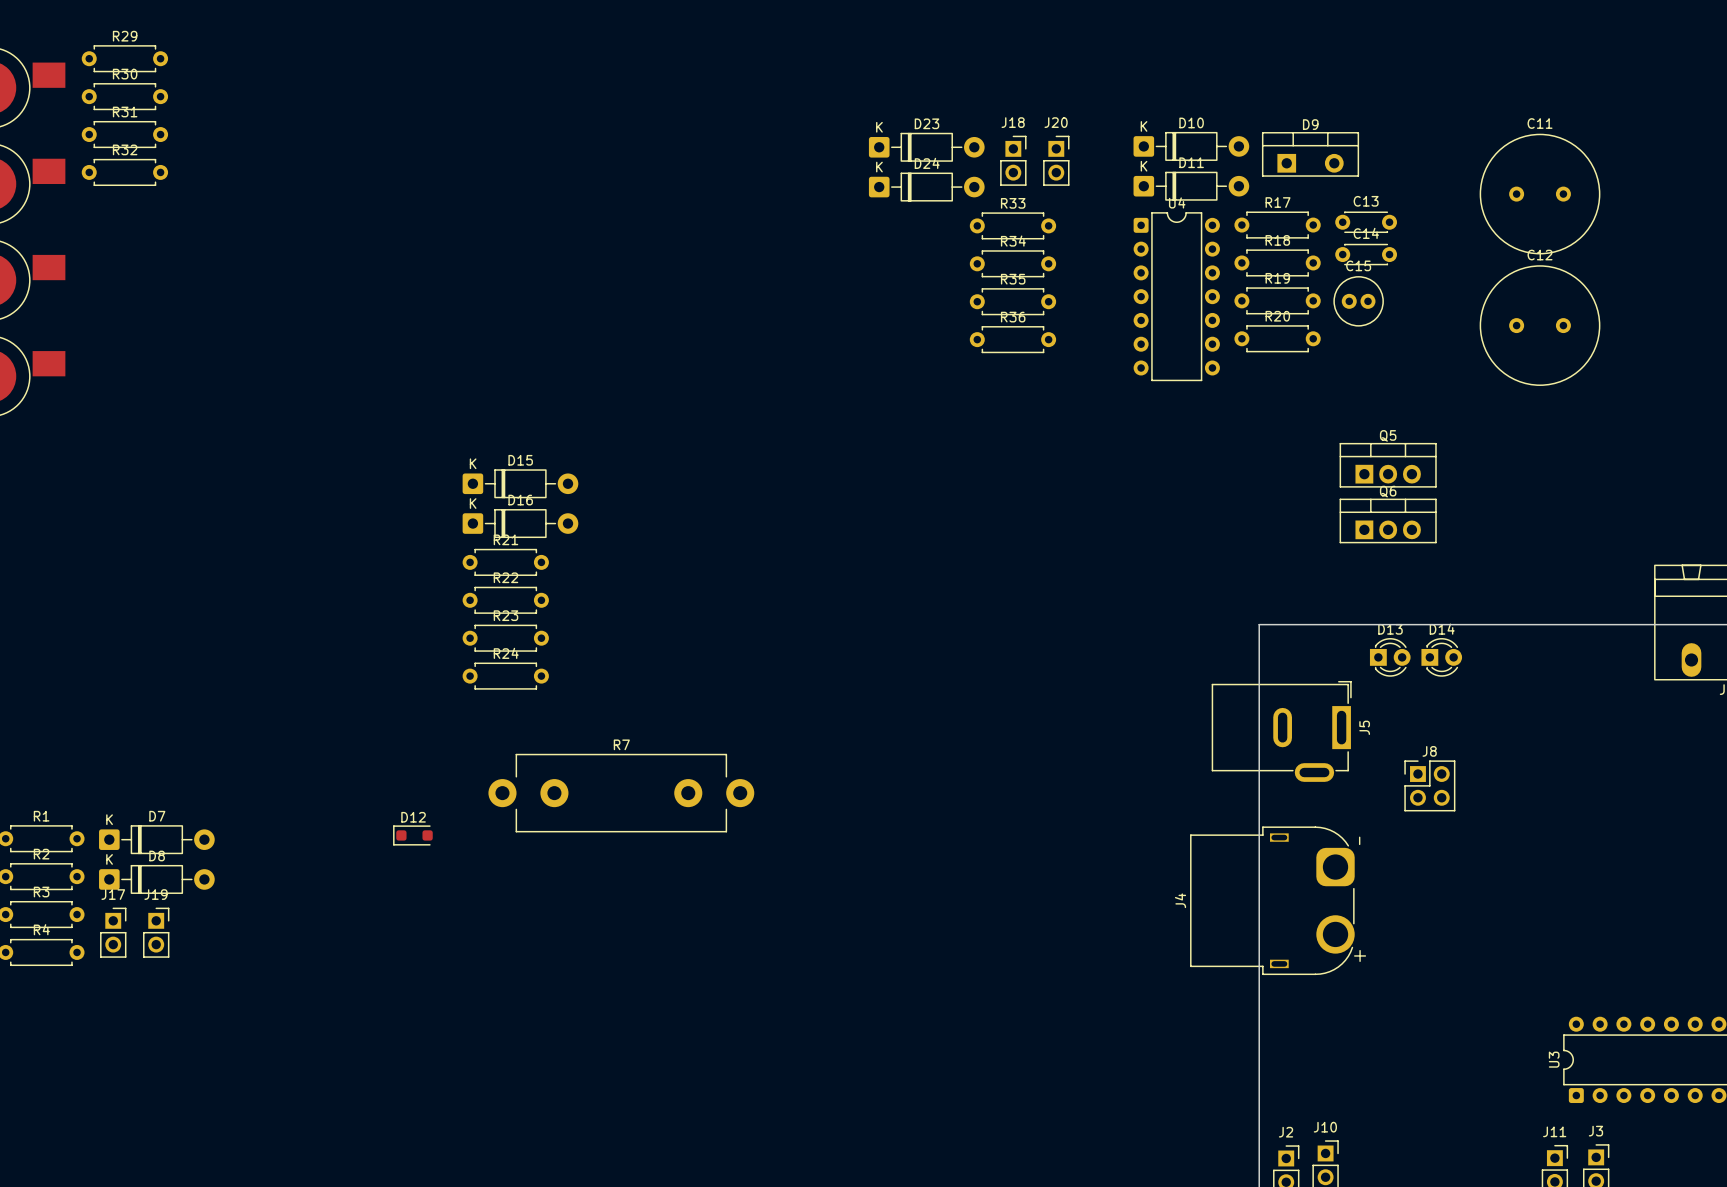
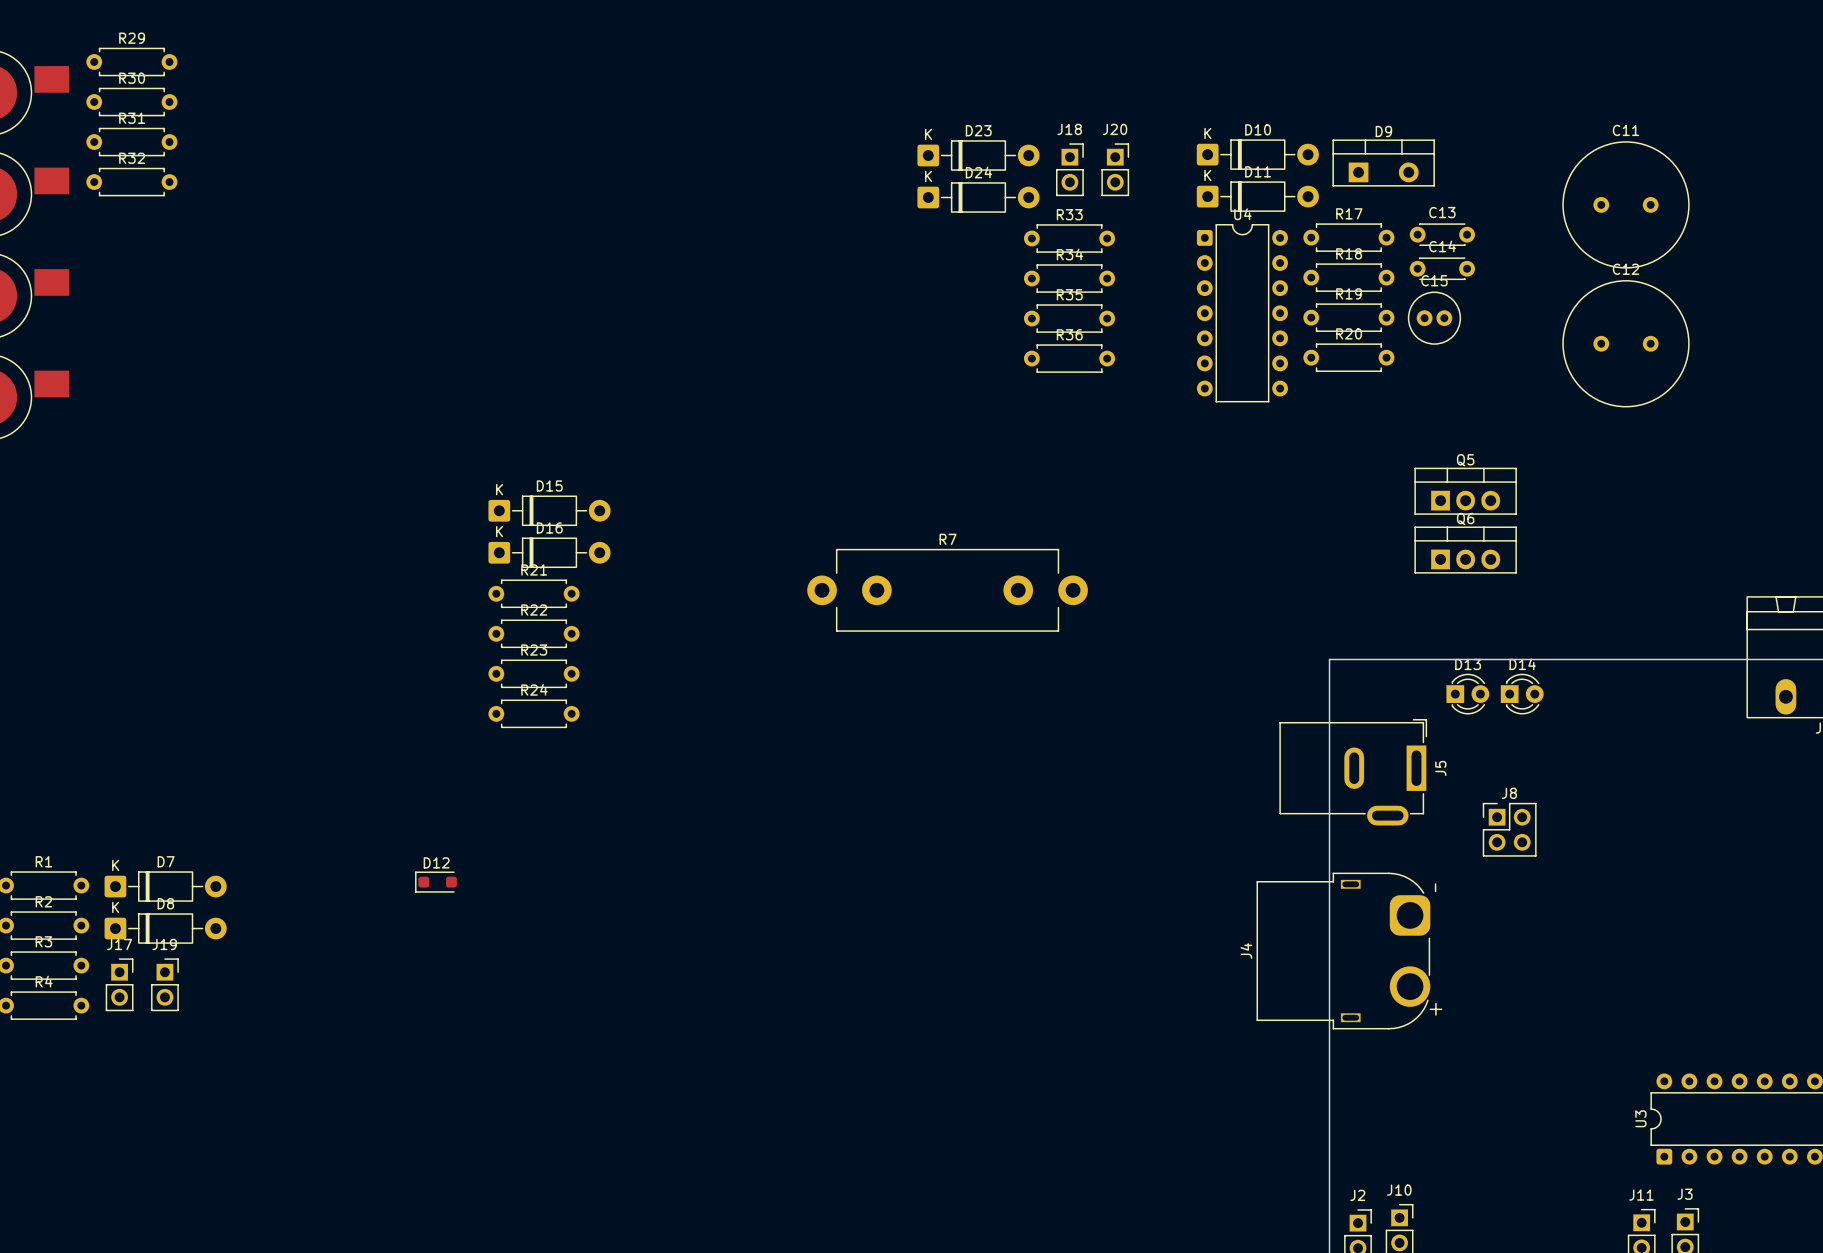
R7 position: (621, 793) -> (947, 590)

